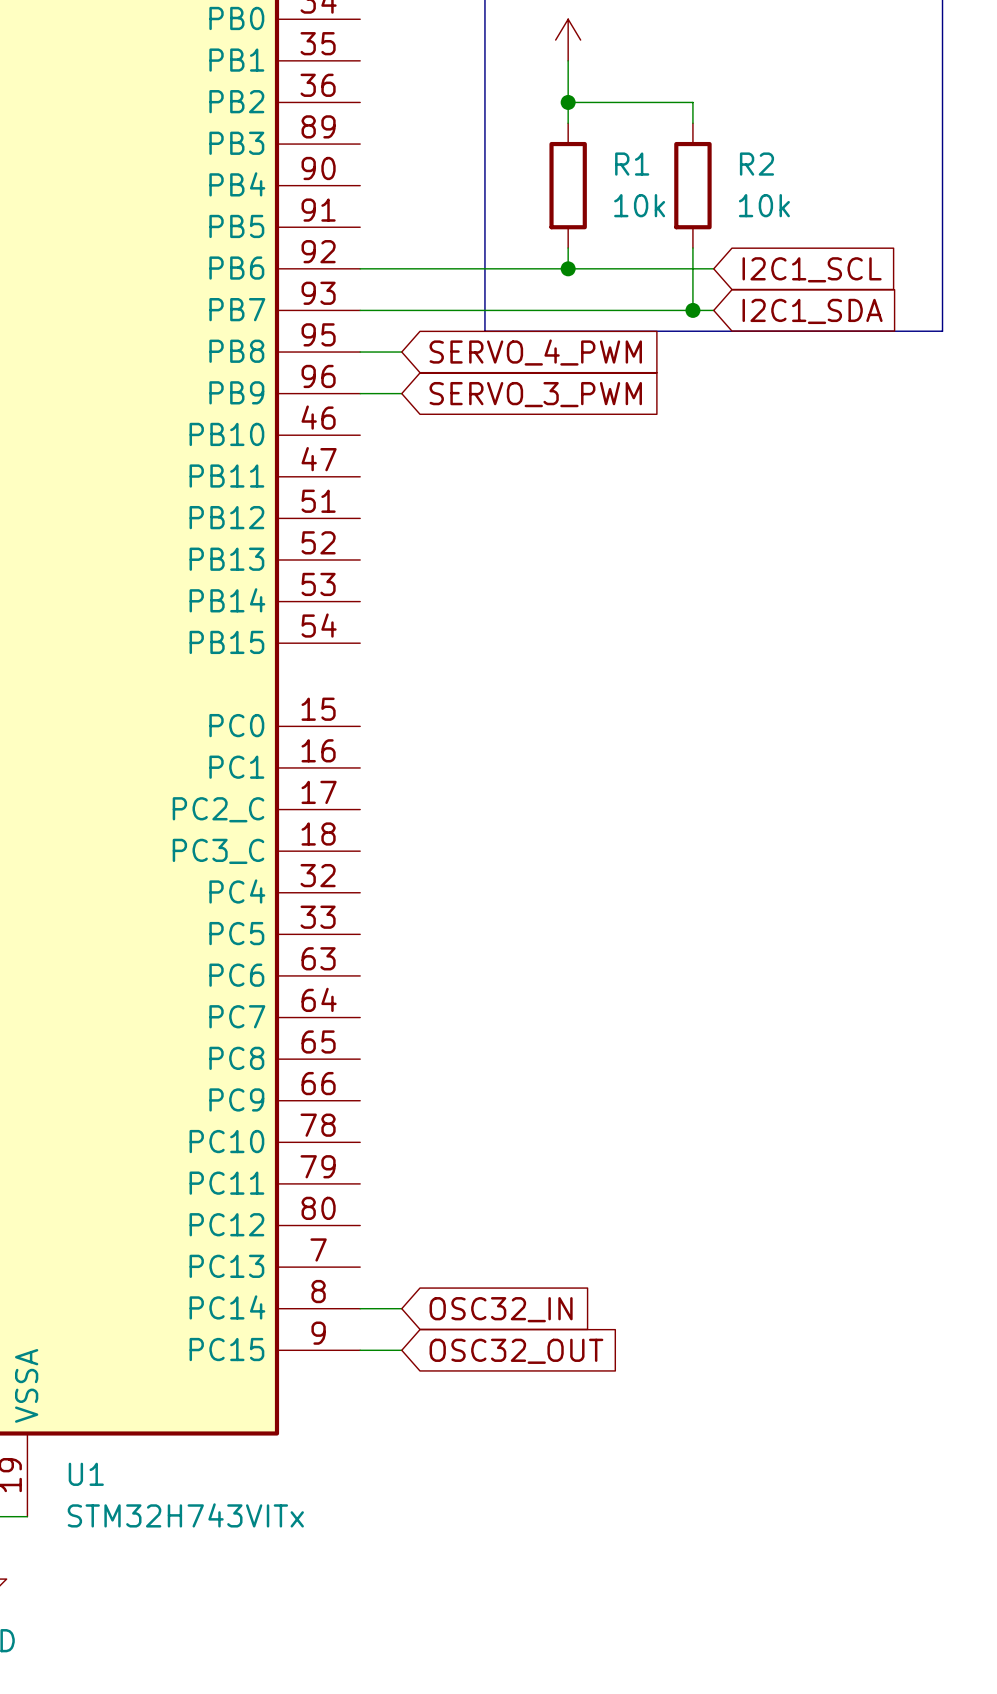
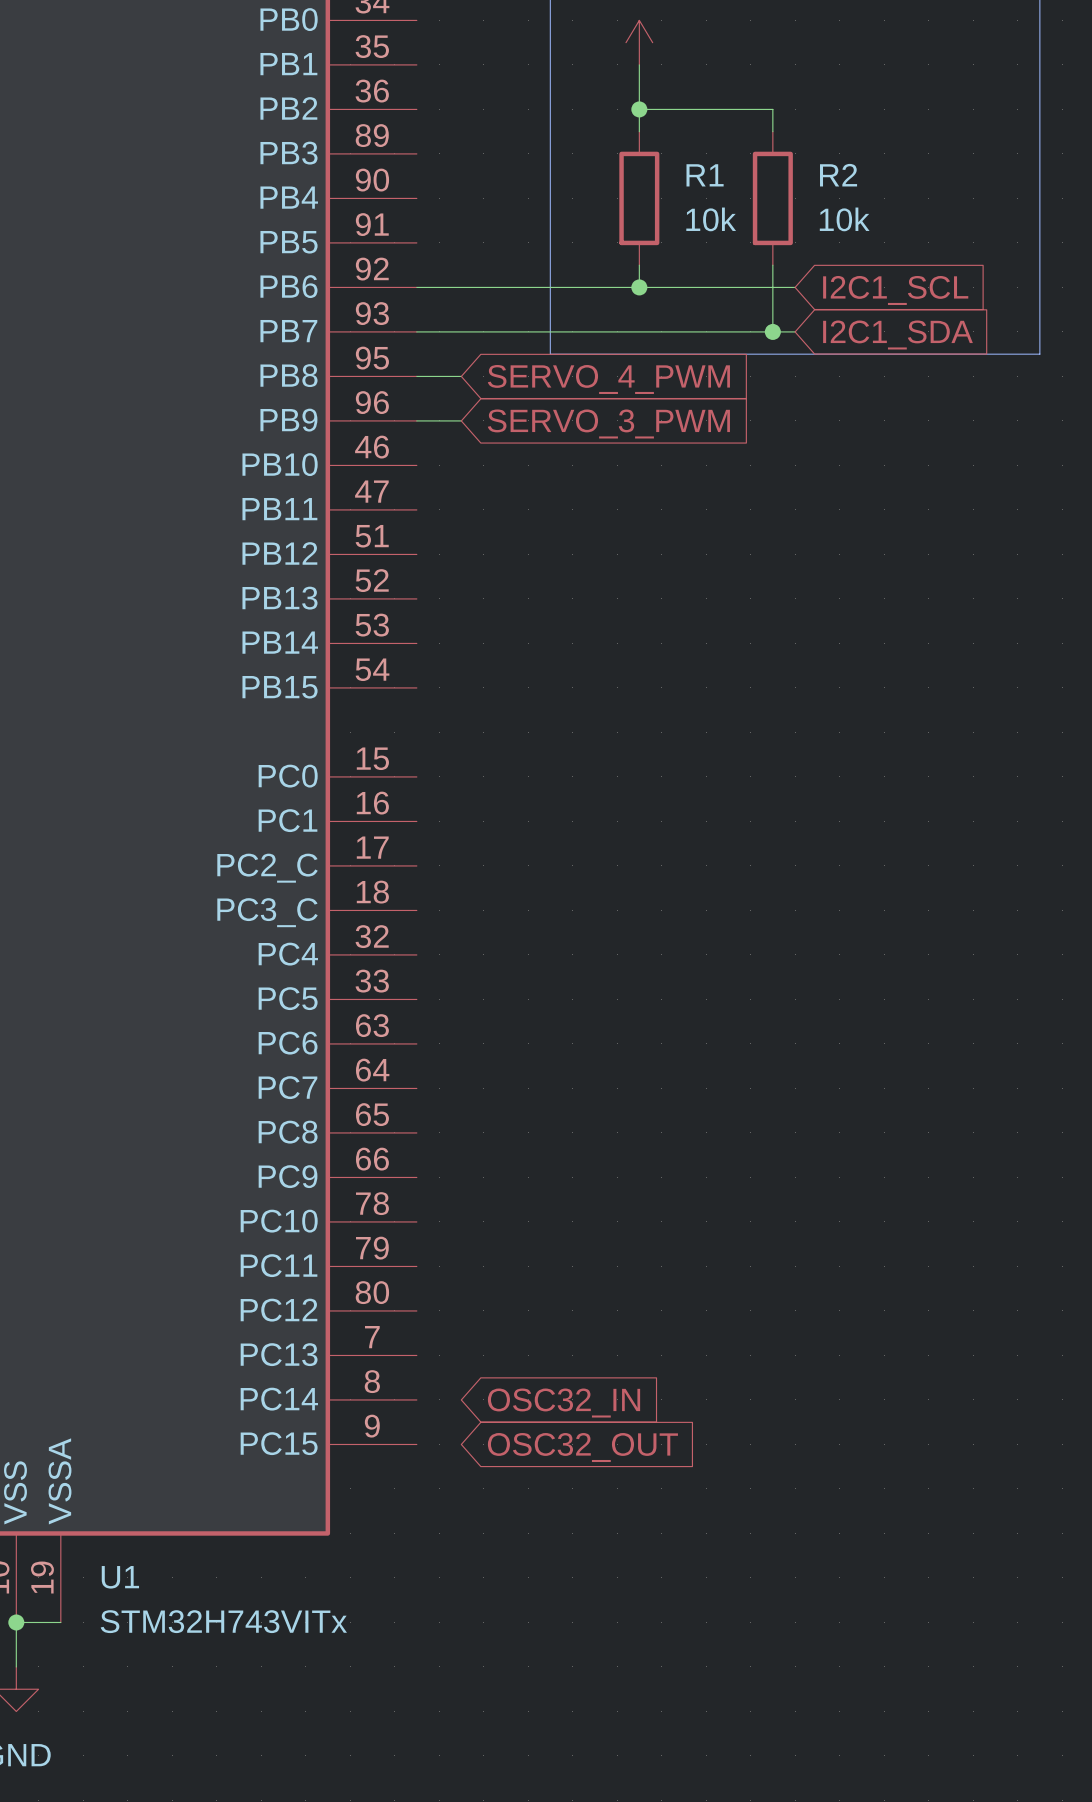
wire: (360, 1308) (401, 1308) -> none
wire: (360, 1350) (401, 1350) -> none

